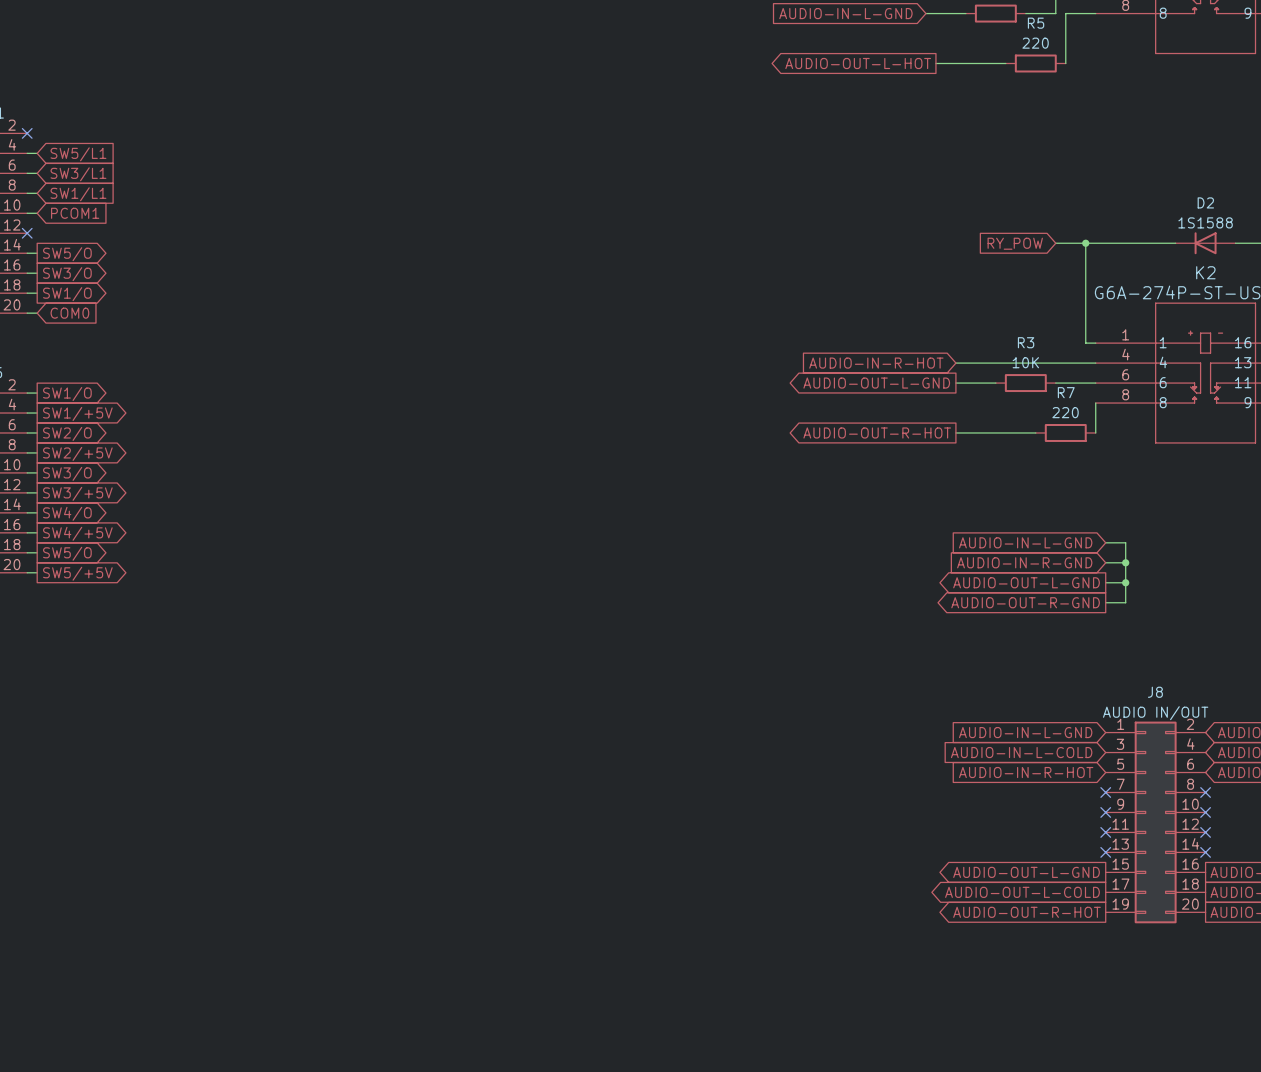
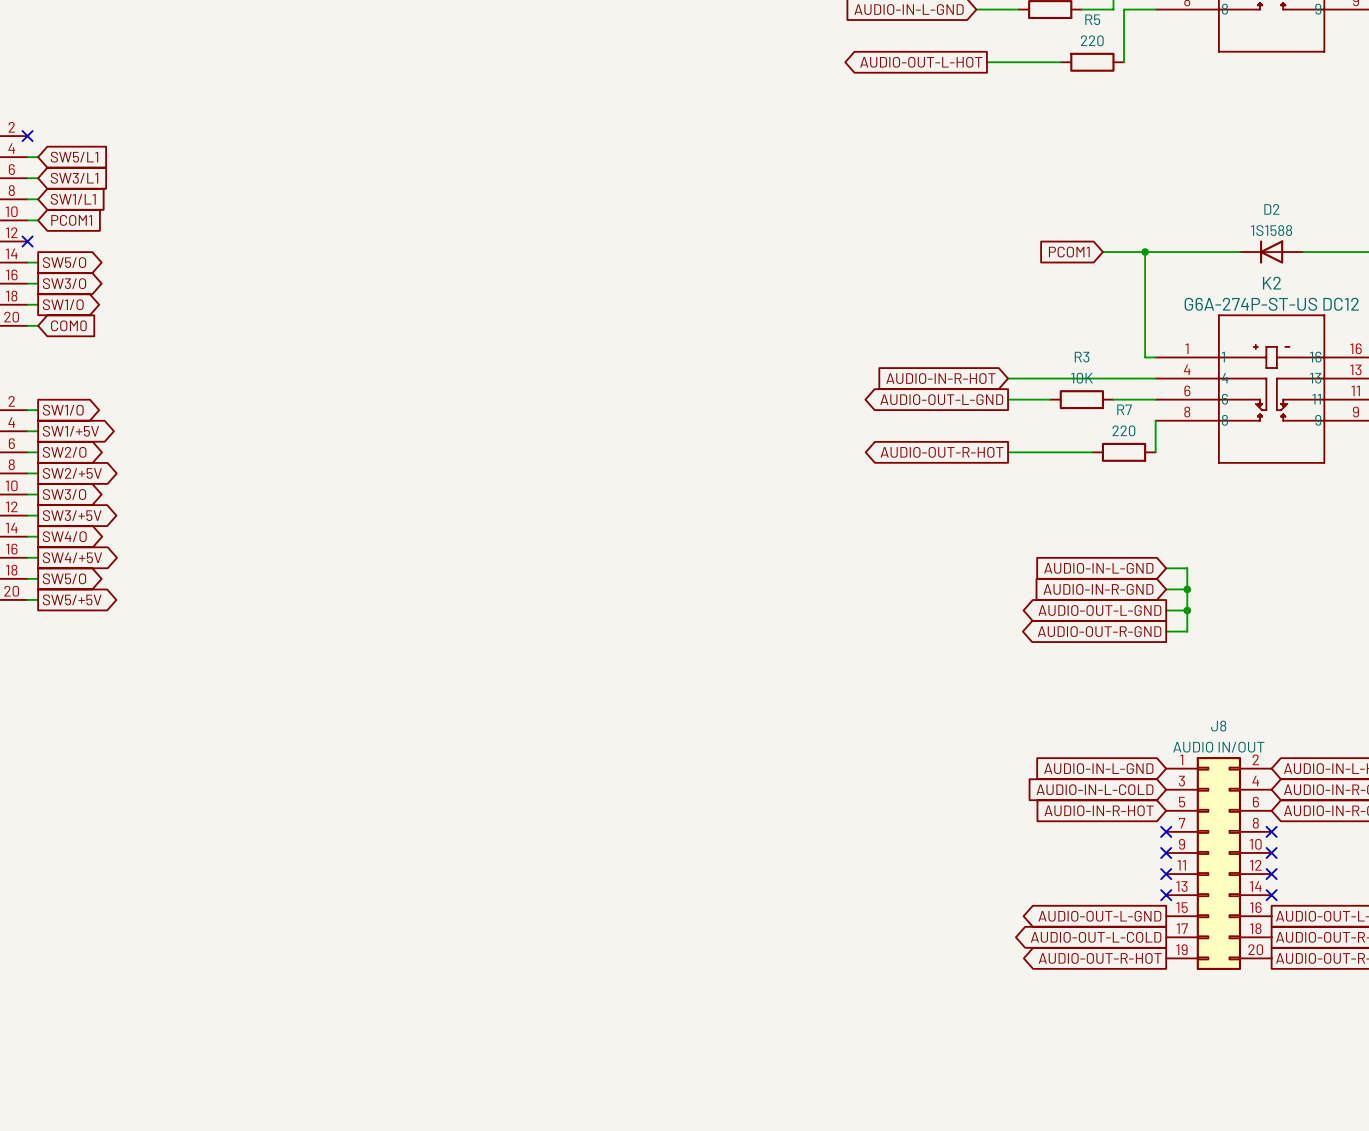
global label: none -> PCOM1 (1069, 252)
global label: RY_POW (1015, 243) -> none
wire: none -> (1102, 252) (1113, 252)

